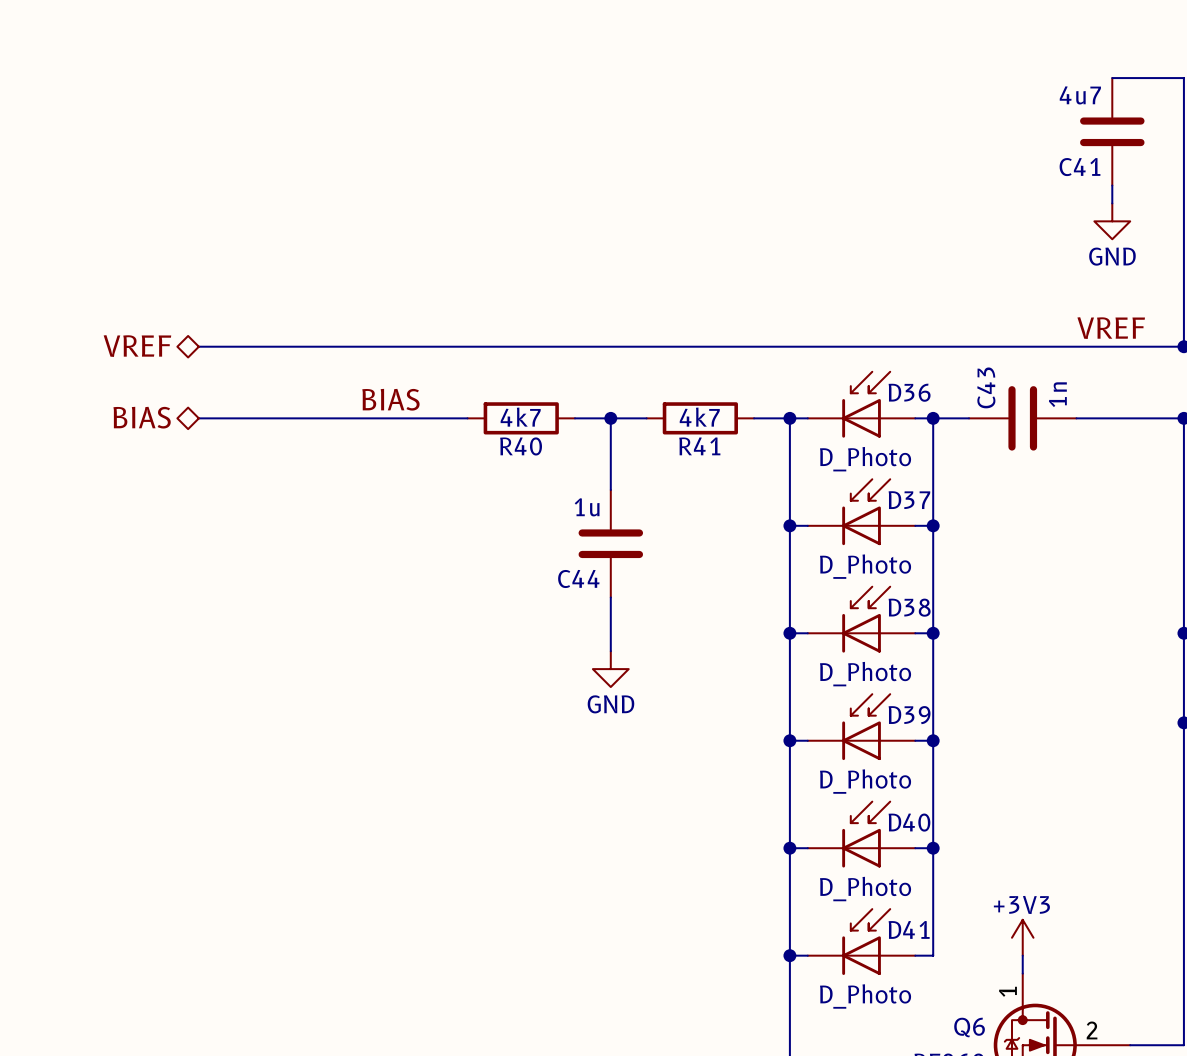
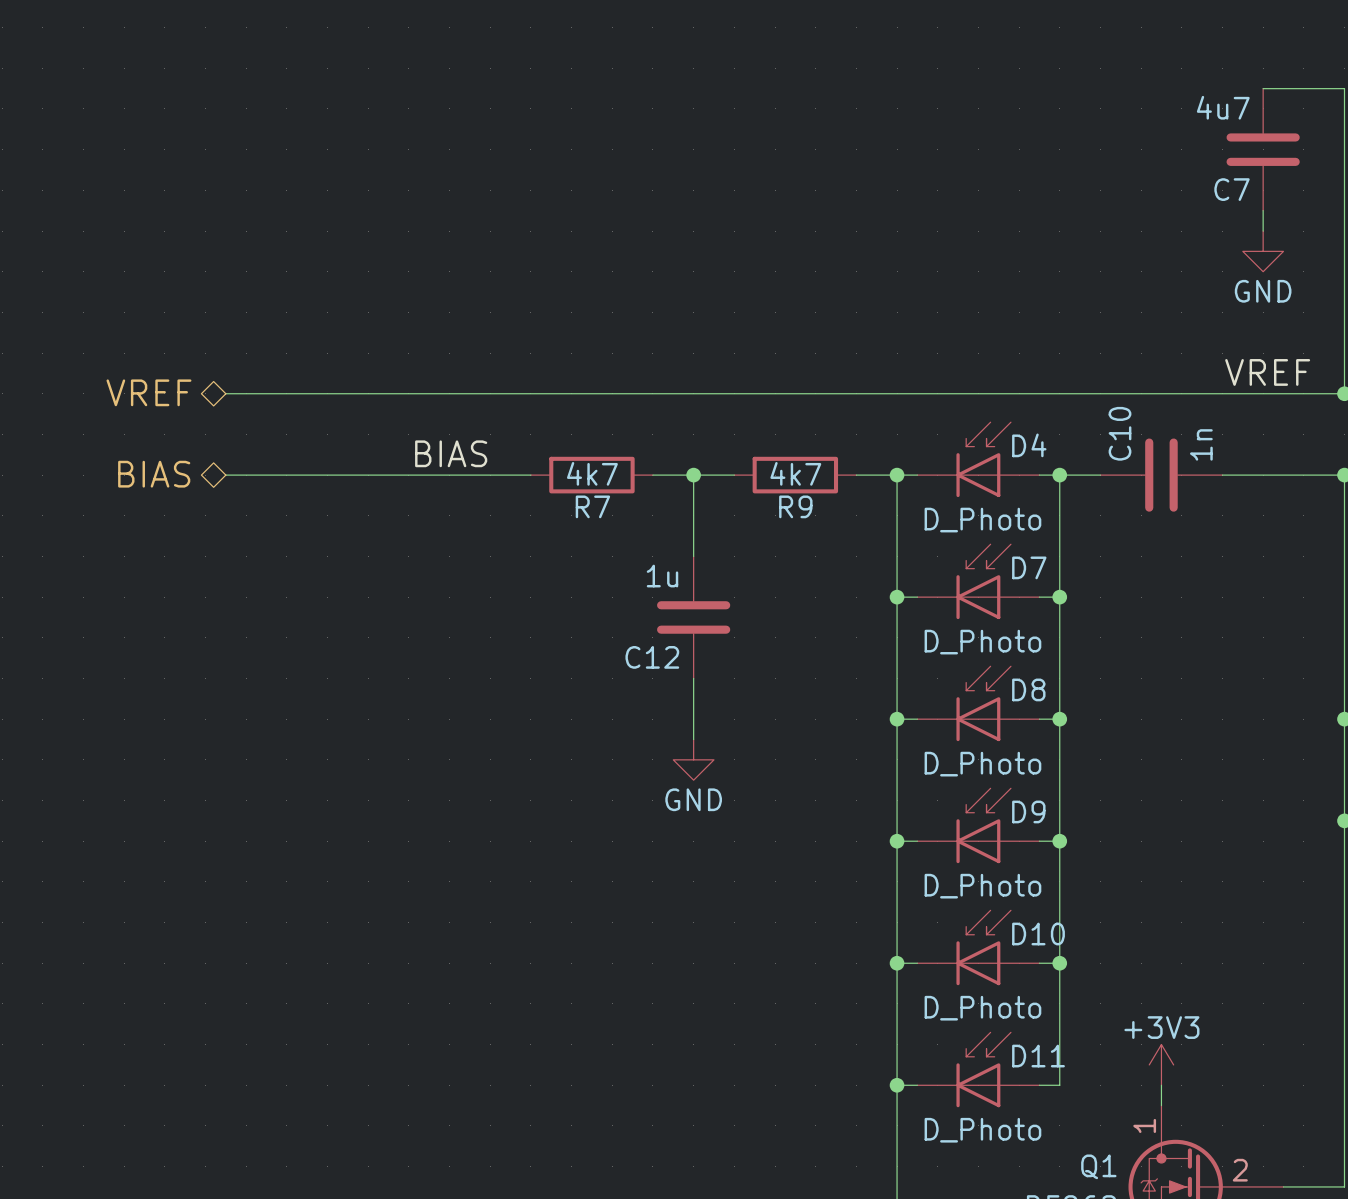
C41 name: C41 (1080, 167) -> C7 (1232, 189)
C43 name: C43 (986, 387) -> C10 (1120, 433)
D36 name: D36 (909, 392) -> D4 (1029, 445)
R40 name: R40 (521, 446) -> R7 (592, 506)
R41 name: R41 (699, 446) -> R9 (795, 506)
D37 name: D37 (909, 500) -> D7 (1029, 567)
C44 name: C44 (578, 578) -> C12 (652, 657)
D38 name: D38 (909, 607) -> D8 (1028, 689)
D39 name: D39 (909, 715) -> D9 (1028, 811)
D40 name: D40 (909, 822) -> D10 (1038, 934)
D41 name: D41 (909, 929) -> D11 (1038, 1056)
Q6 name: Q6 (969, 1027) -> Q1 (1098, 1166)

